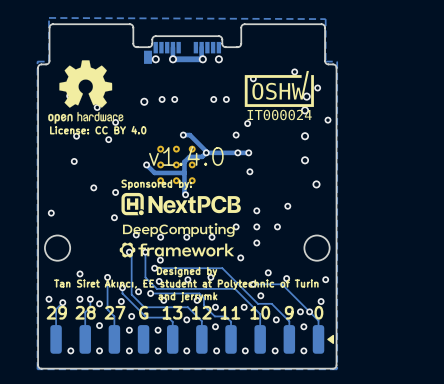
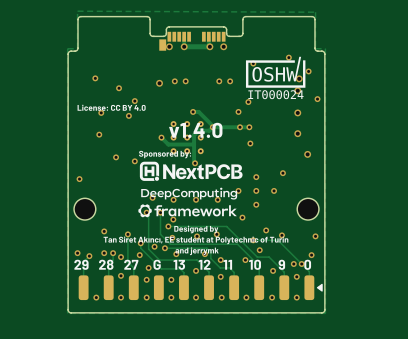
drawing: [48, 60, 124, 124] -> none
via: (114, 217) -> none

